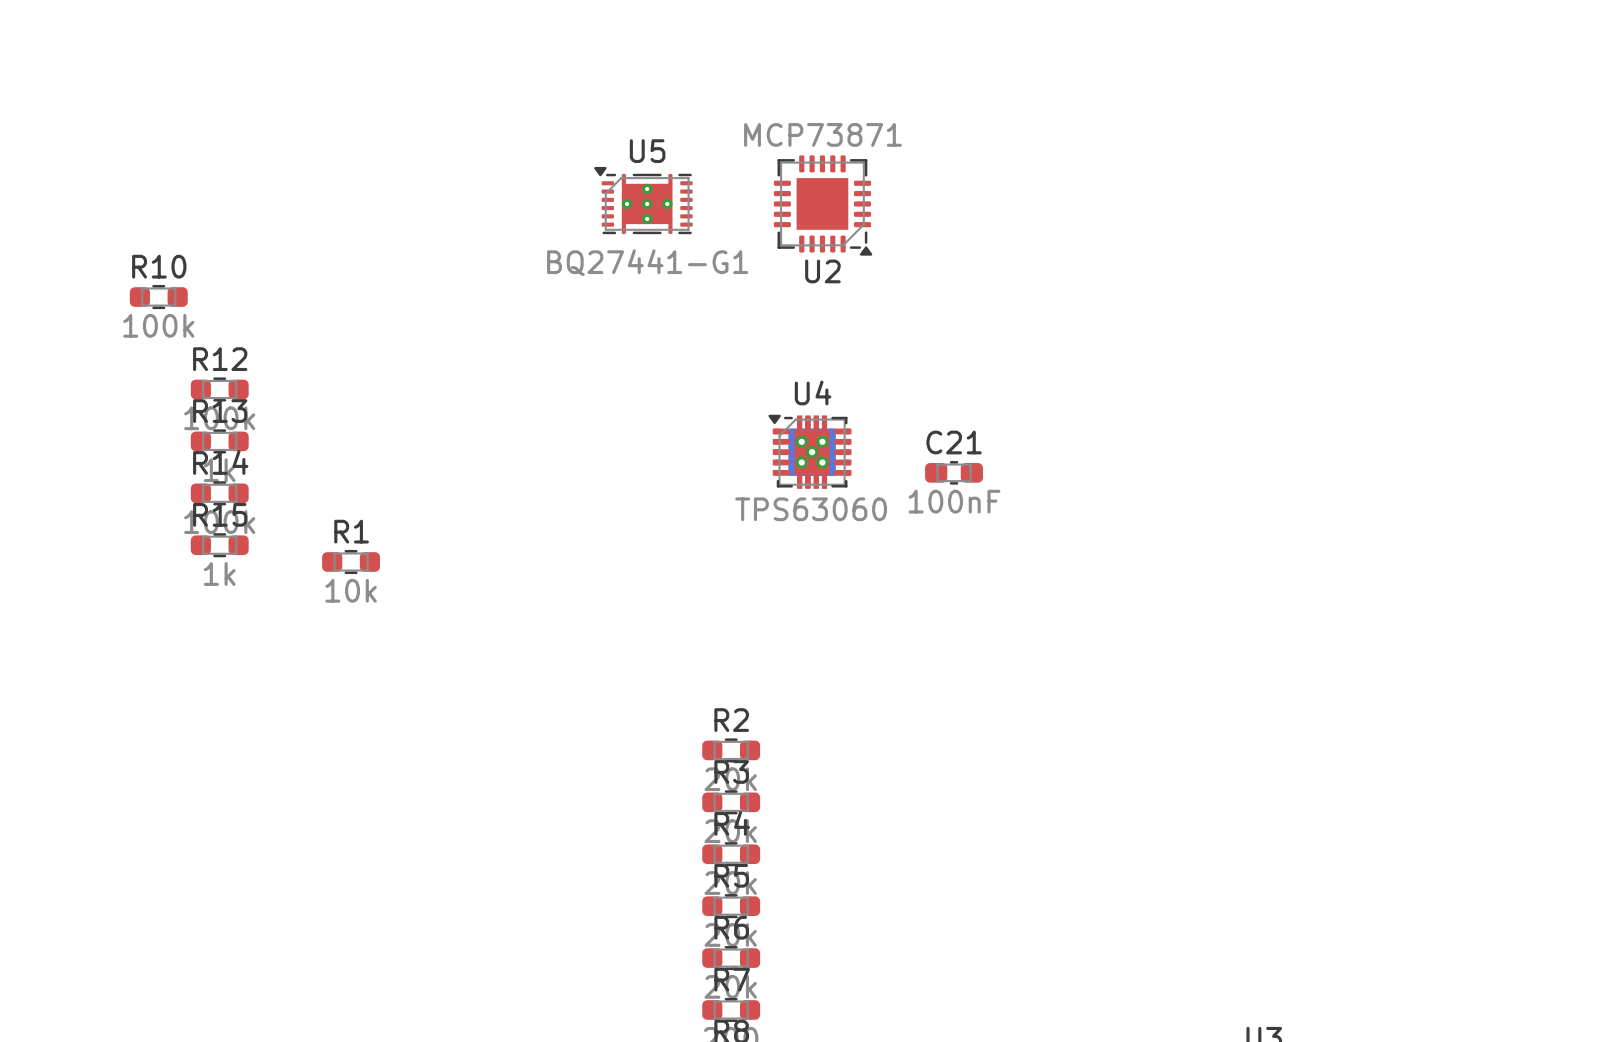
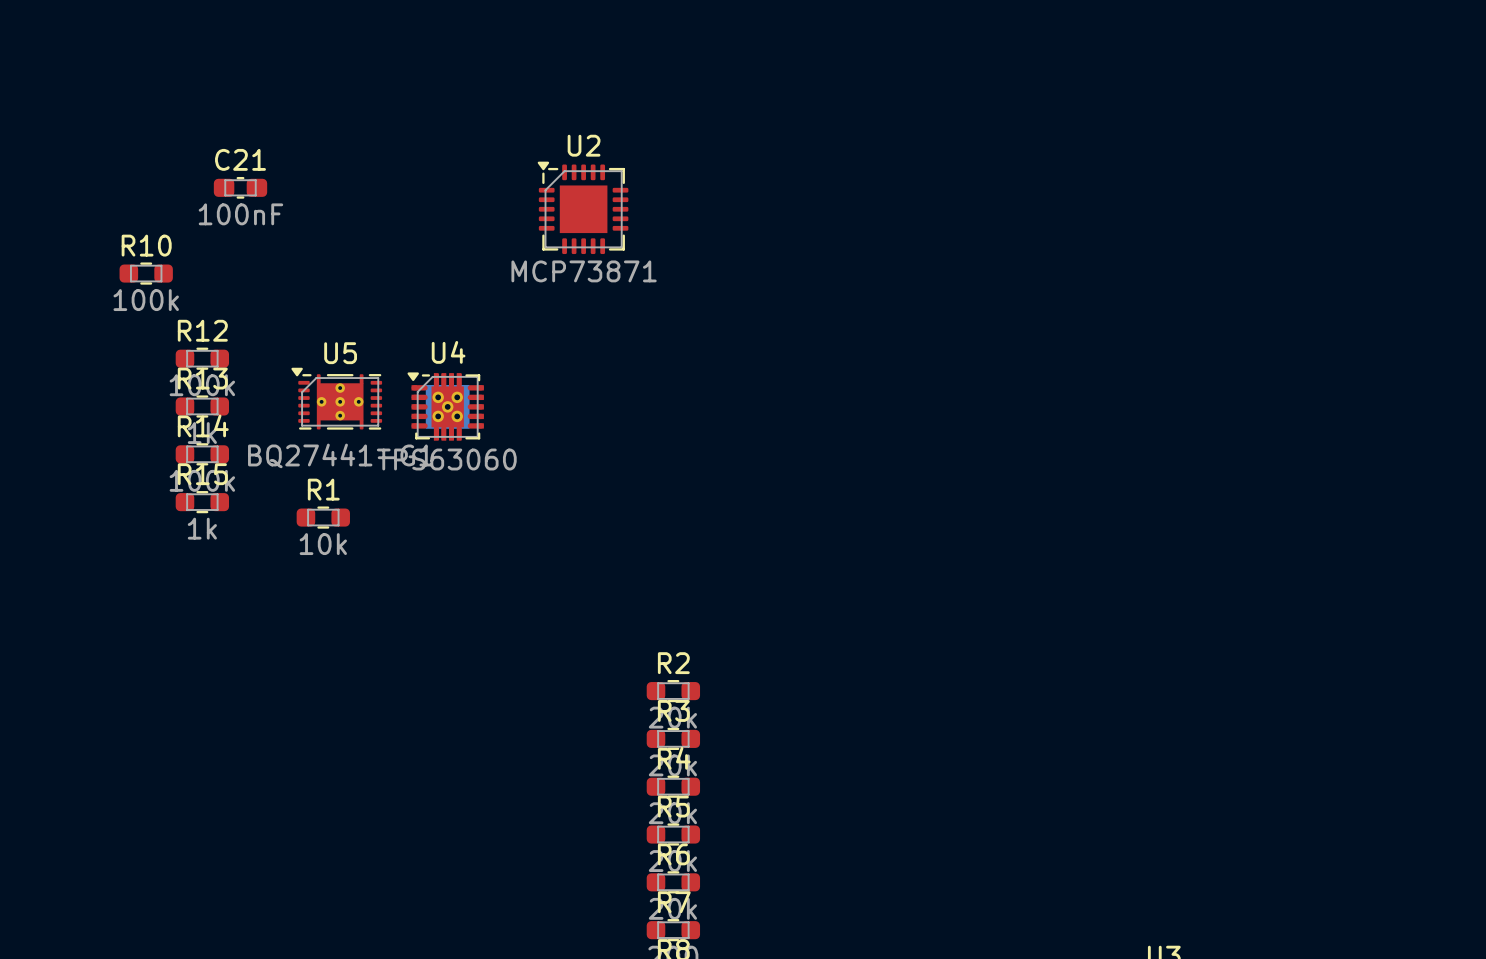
U5 position: (643, 200) -> (336, 398)
U2 rotation: 0° (823, 205) -> 180° (583, 207)
U2 position: (823, 205) -> (583, 207)
U4 position: (809, 451) -> (445, 406)
C21 position: (954, 472) -> (240, 187)

